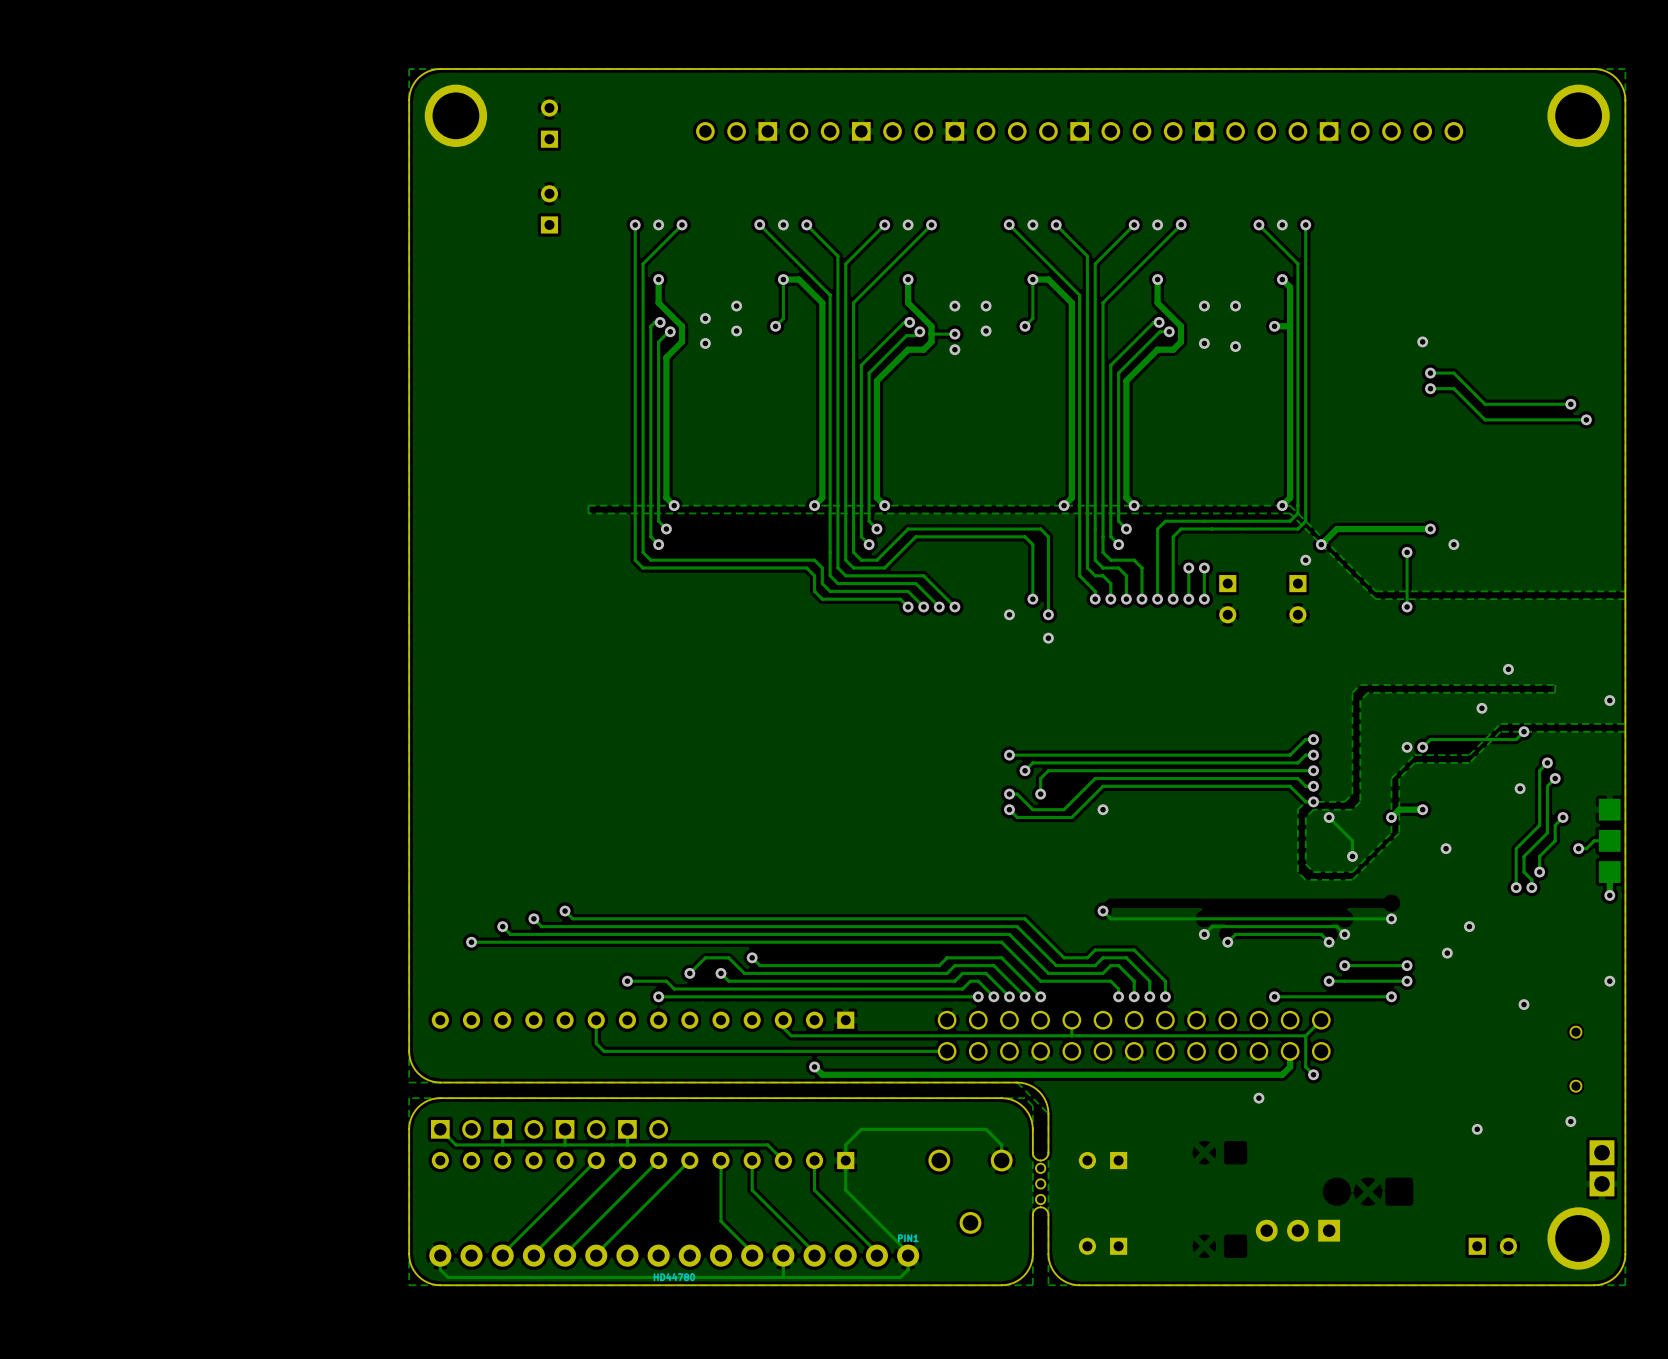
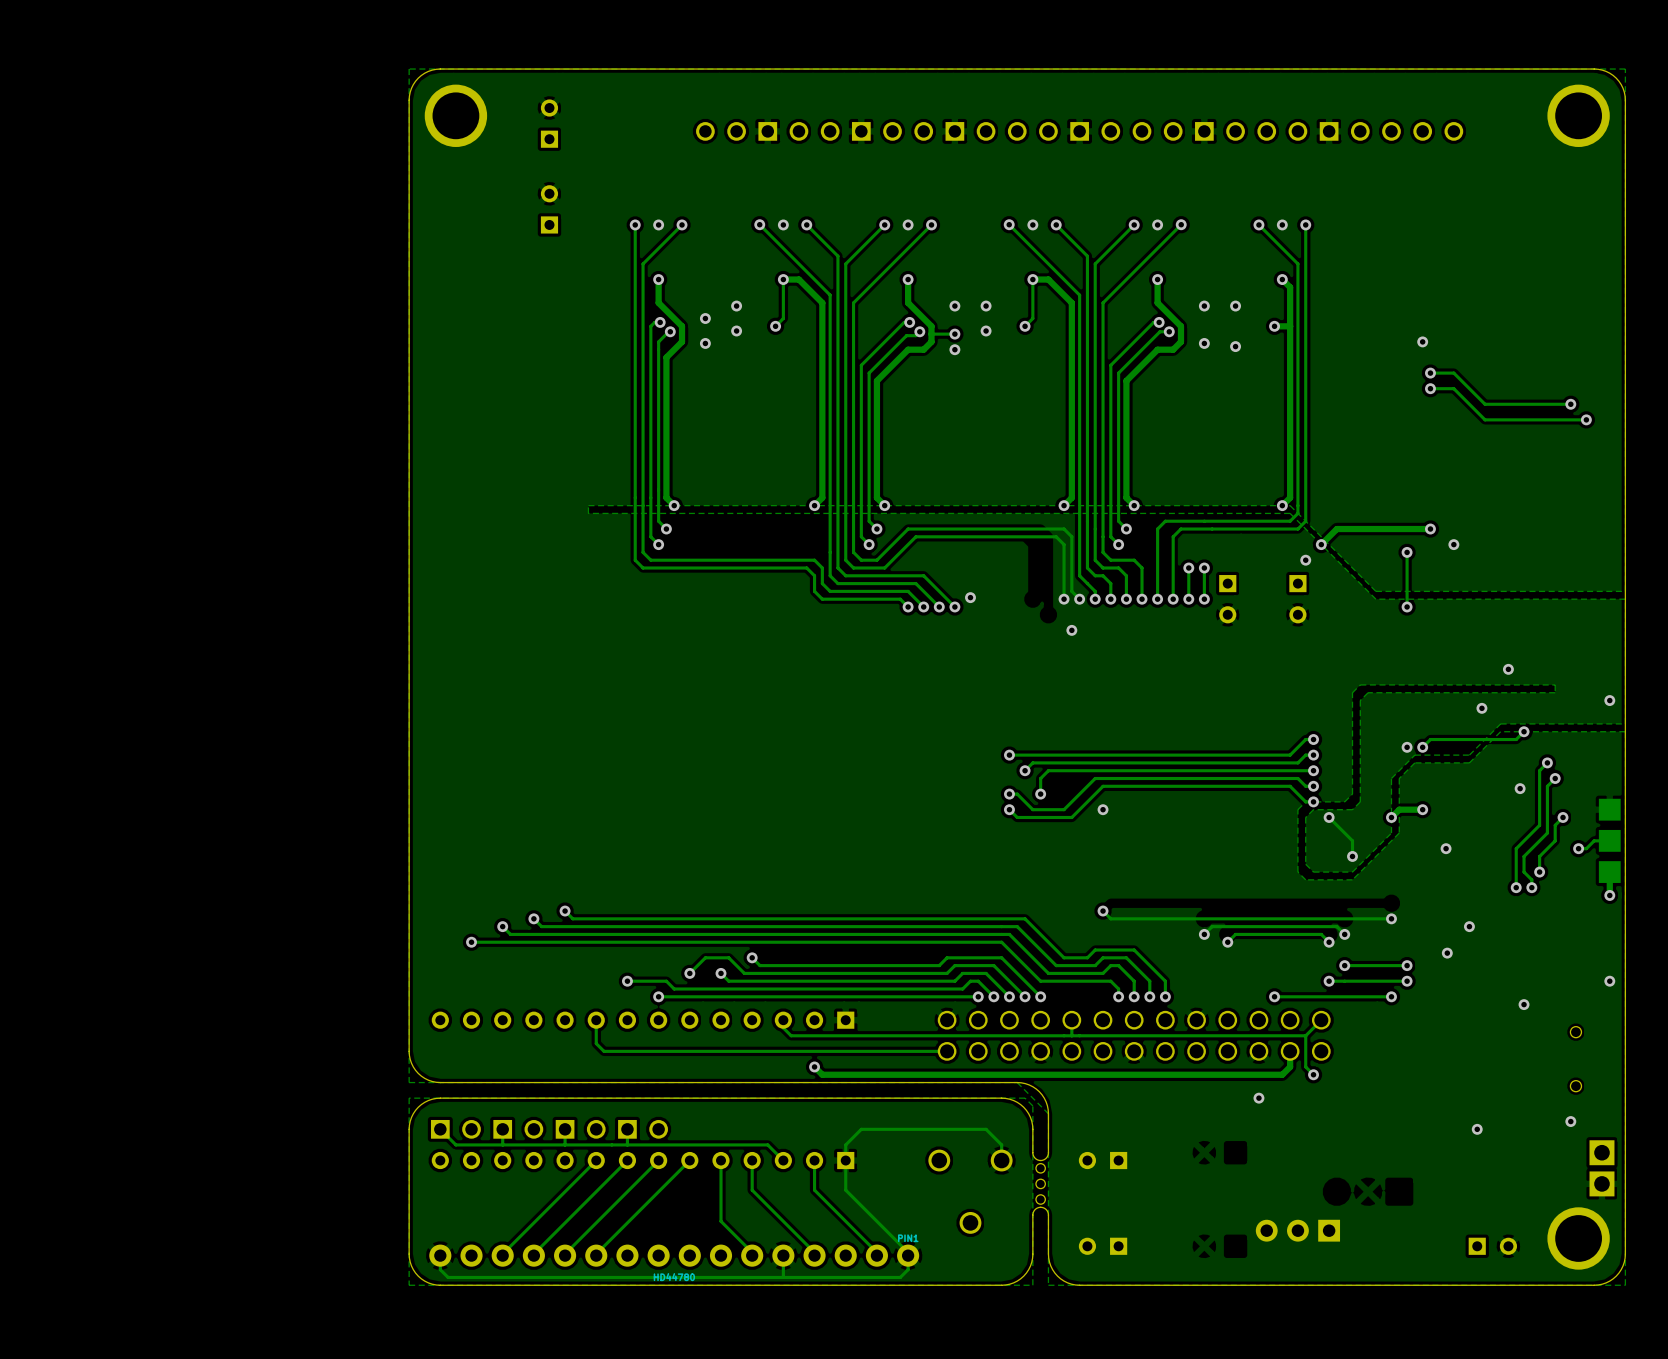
track: (1040, 529) (1048, 536) (1048, 614) -> (1040, 529) (1064, 529) (1071, 536) (1071, 591) (1079, 599)
track: (1025, 536) (1032, 544) (1032, 599) -> (1025, 536) (1056, 536) (1064, 544) (1064, 599)
via: none -> (970, 597)
via: (1032, 599) -> none
via: none -> (1064, 599)
via: none -> (1079, 599)
via: (1009, 614) -> none
via: (1048, 614) -> none
via: none -> (1071, 630)
via: (1048, 638) -> none

